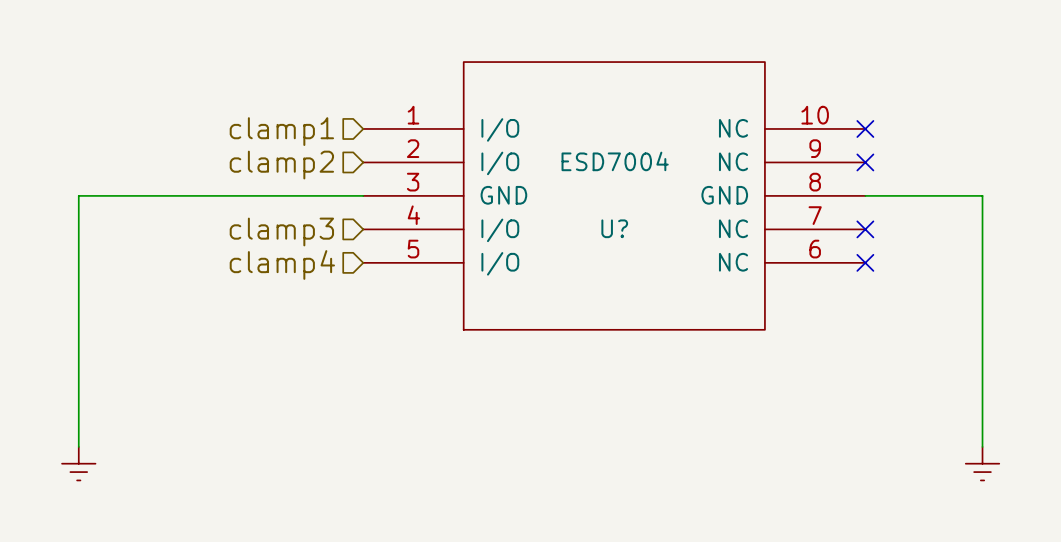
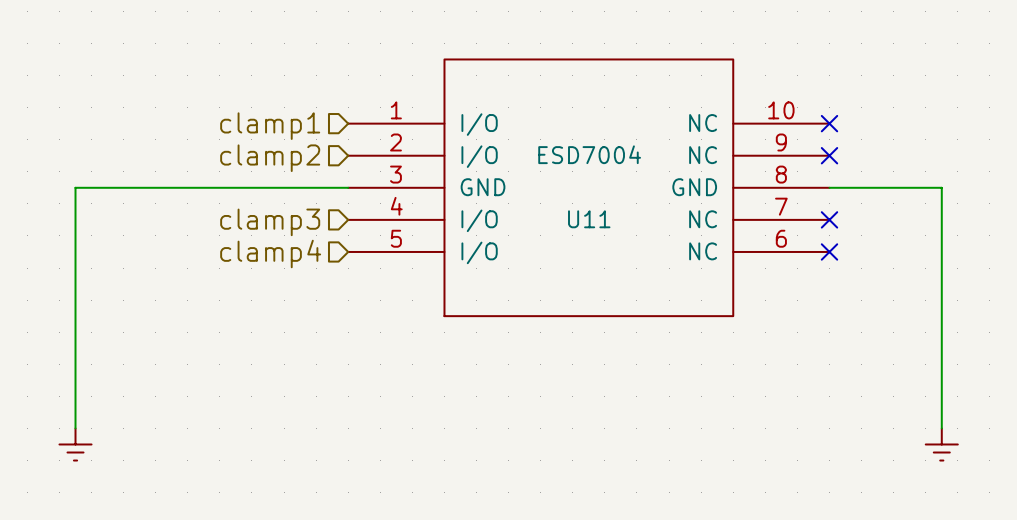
U? name: U? (614, 228) -> U11 (589, 219)

